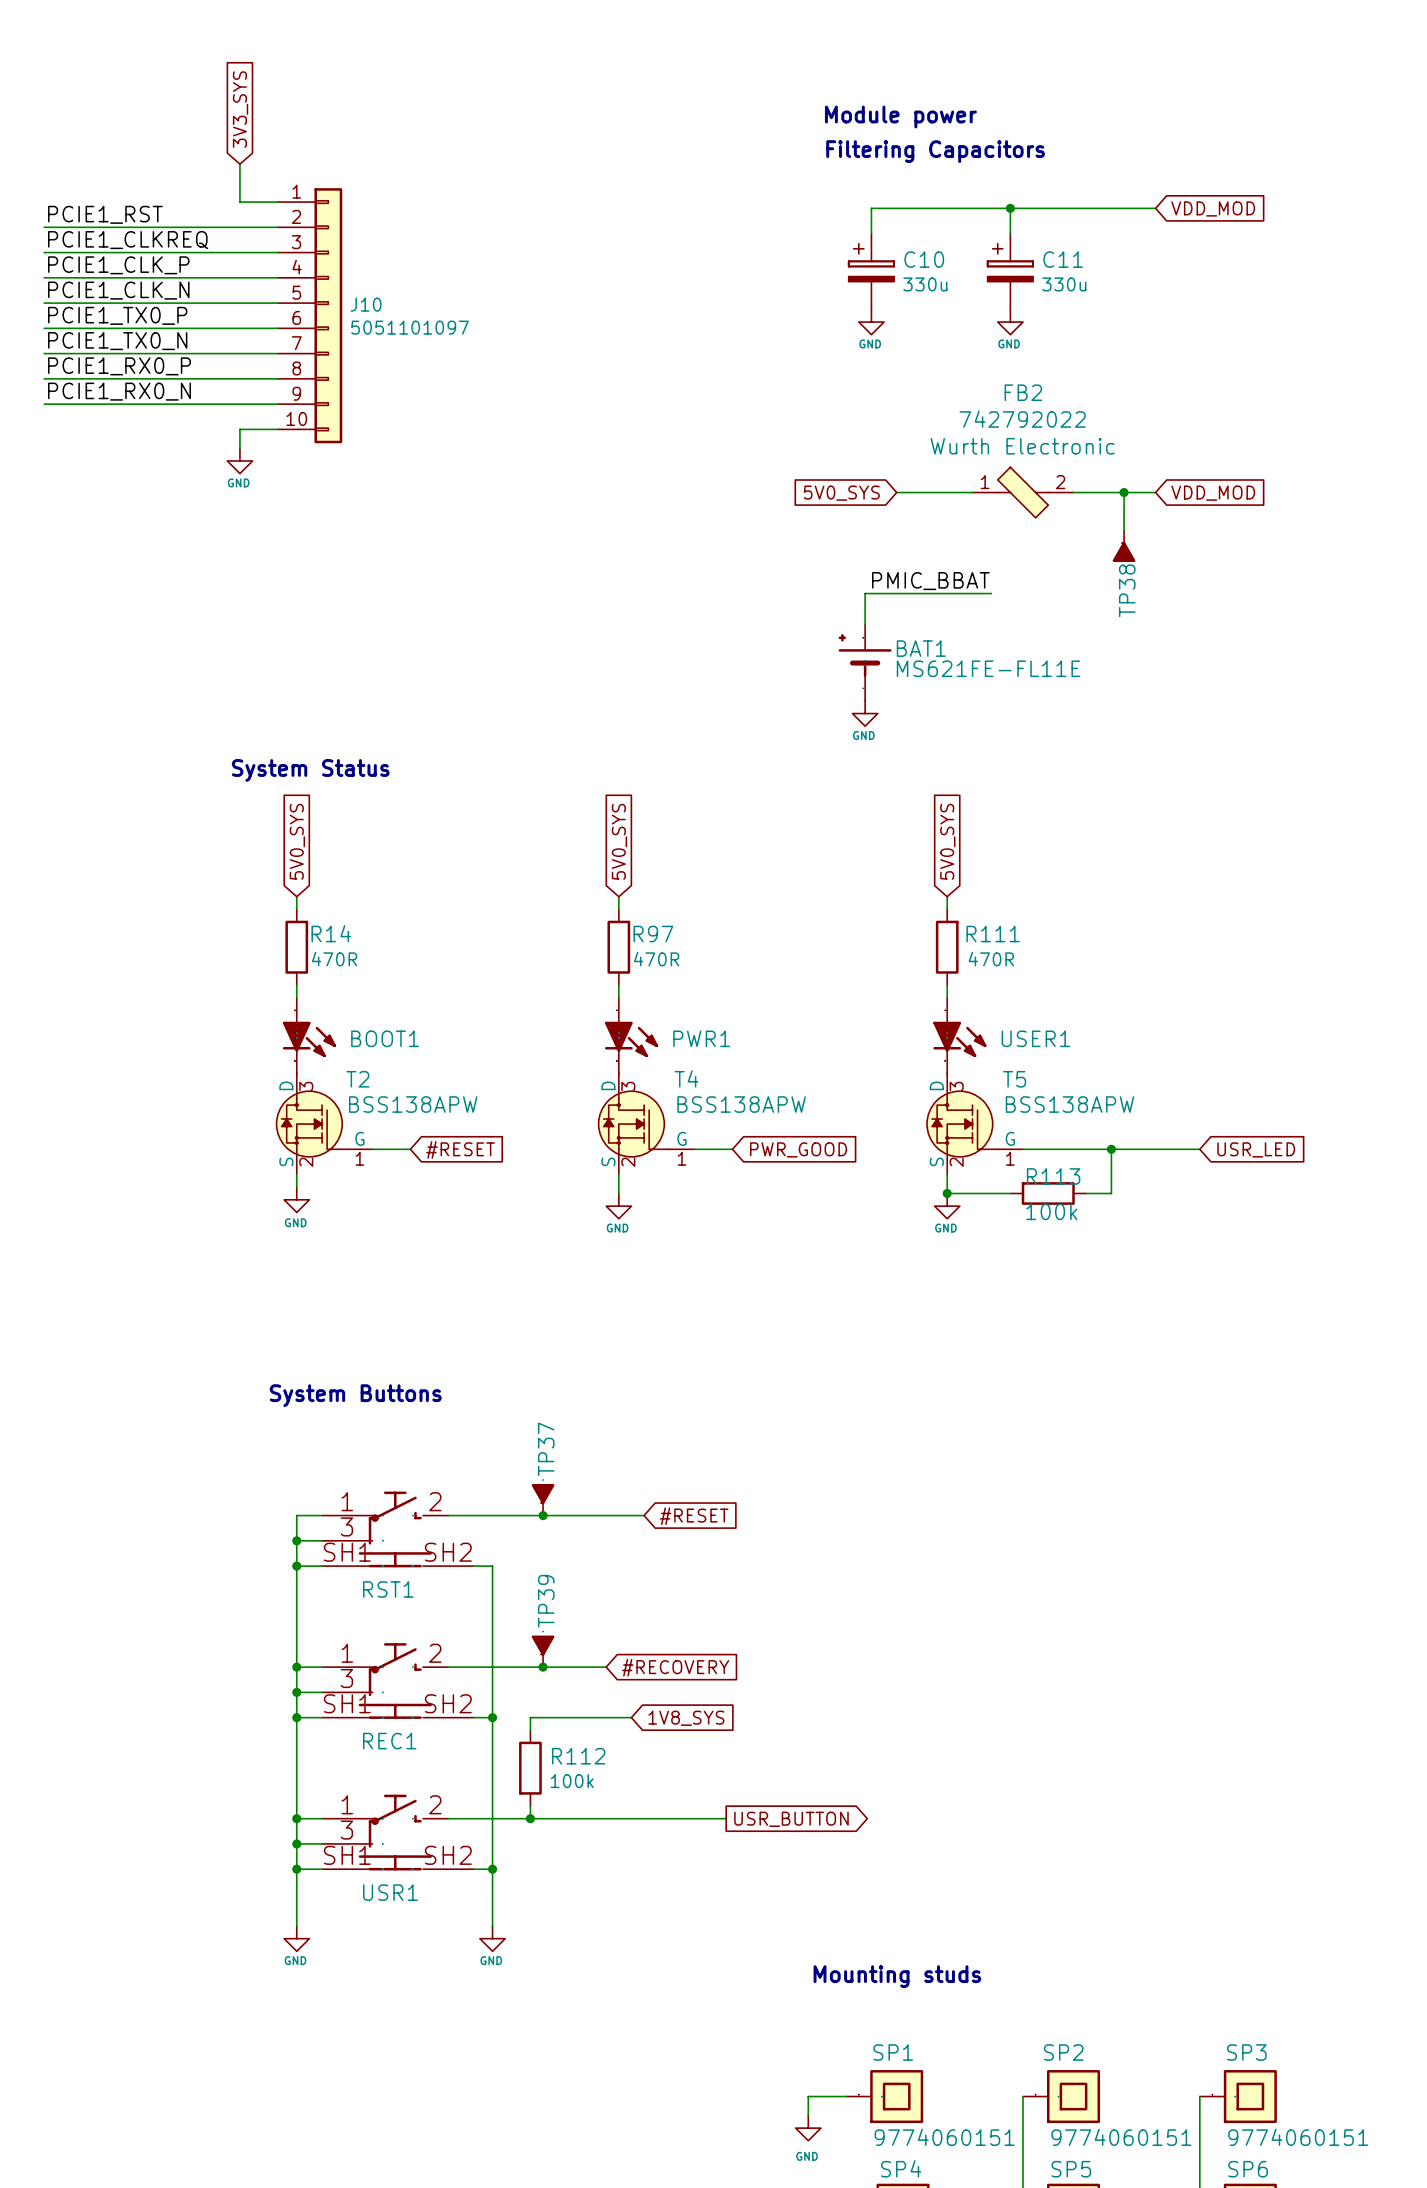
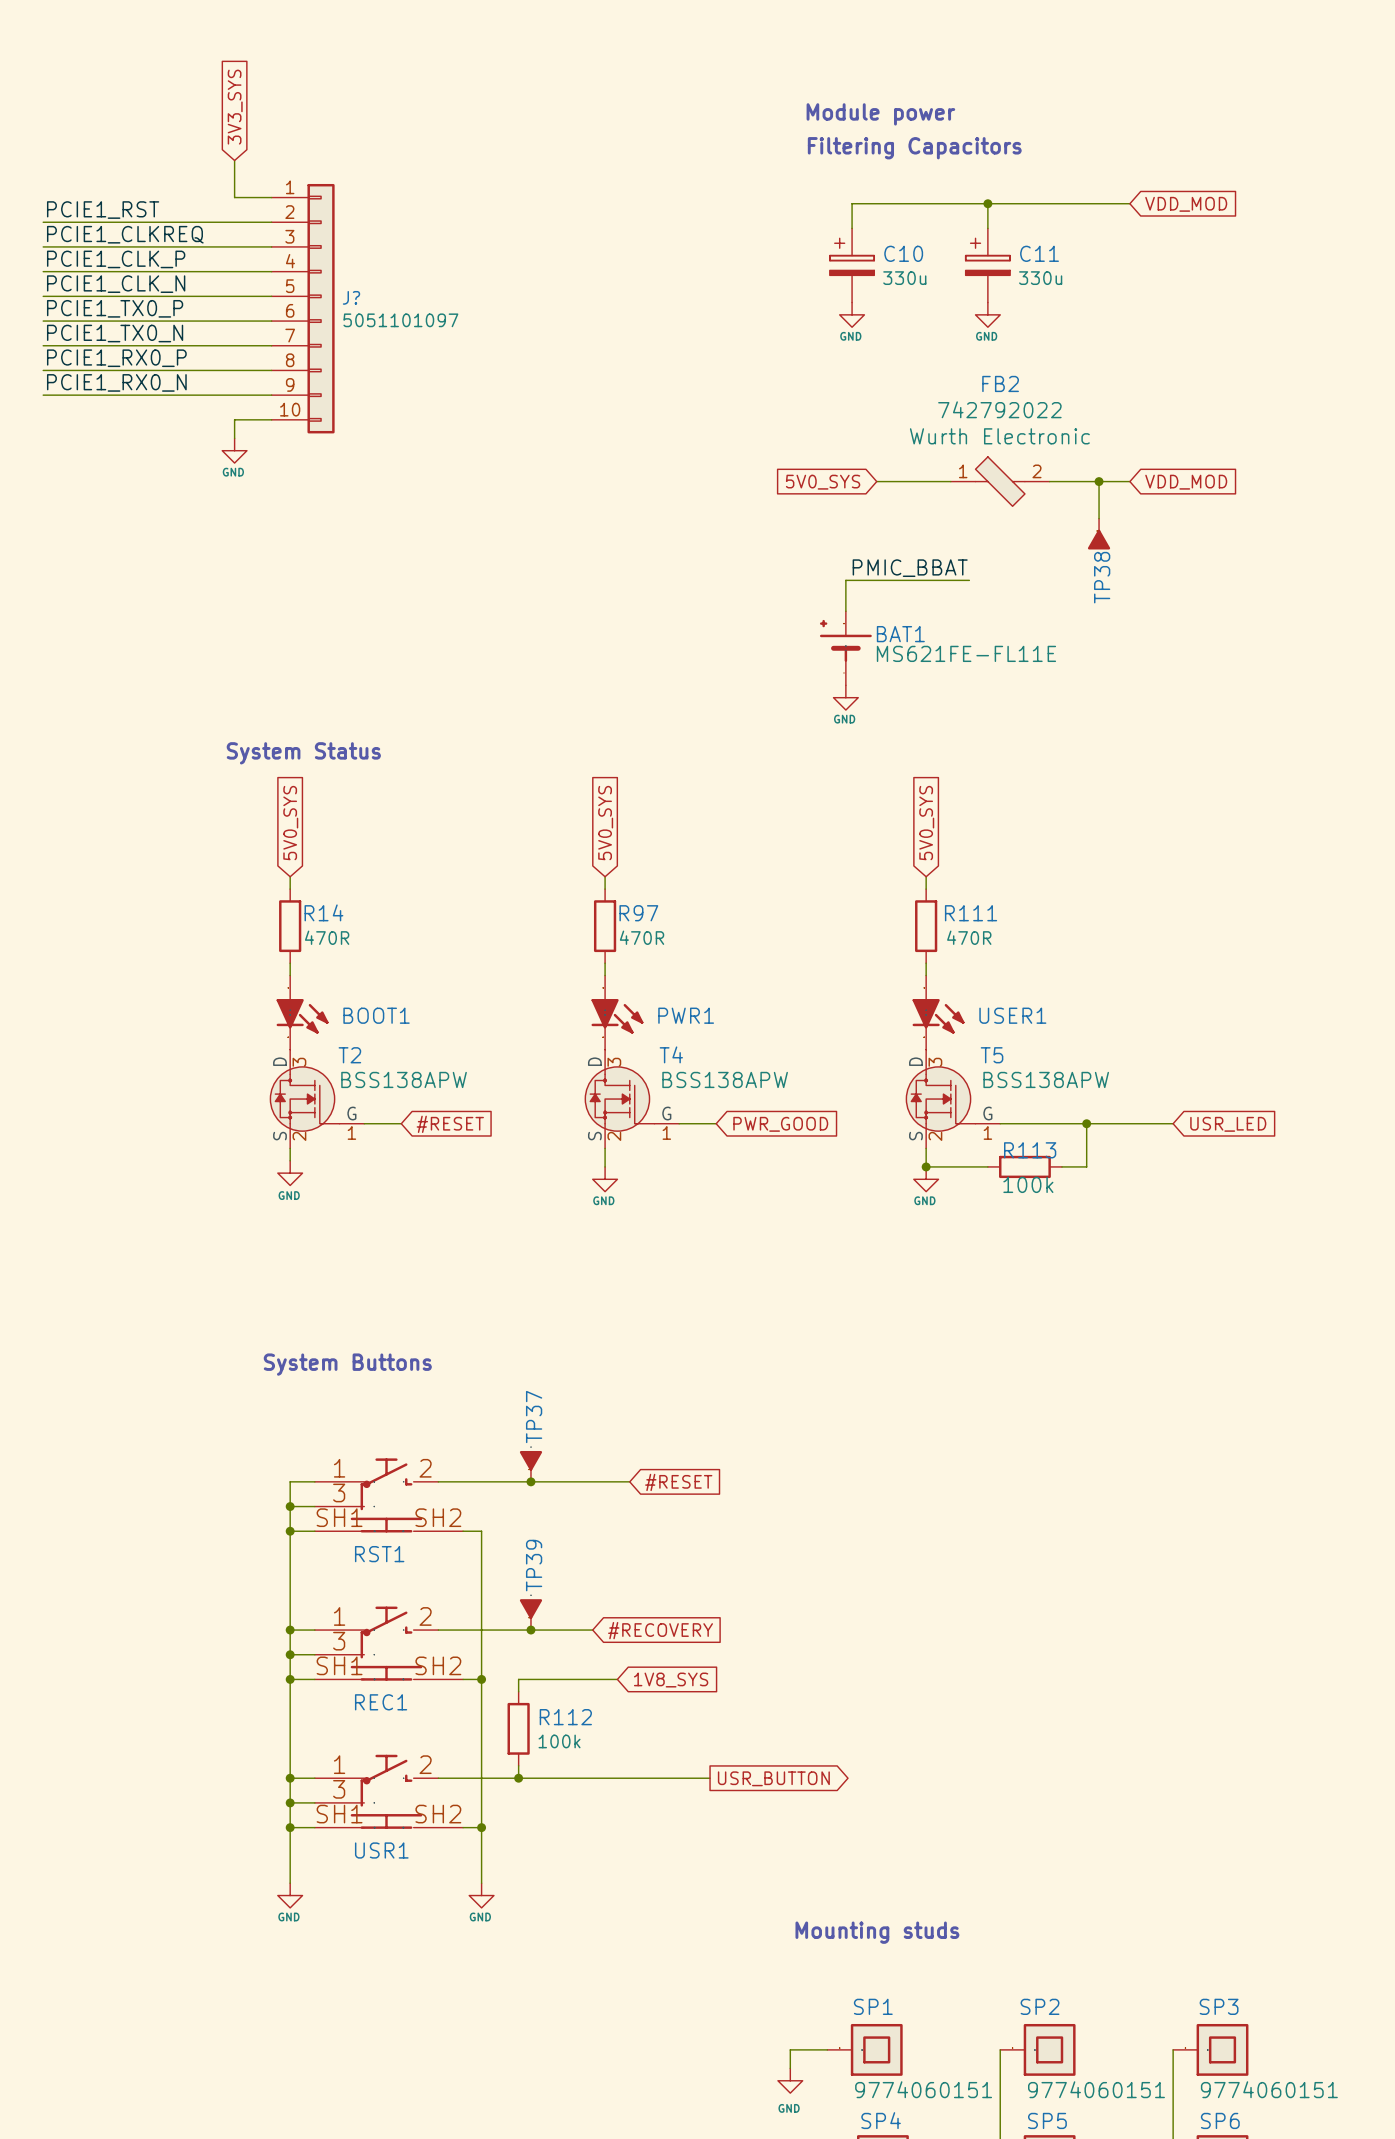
J10 name: J10 (366, 304) -> J? (351, 297)

